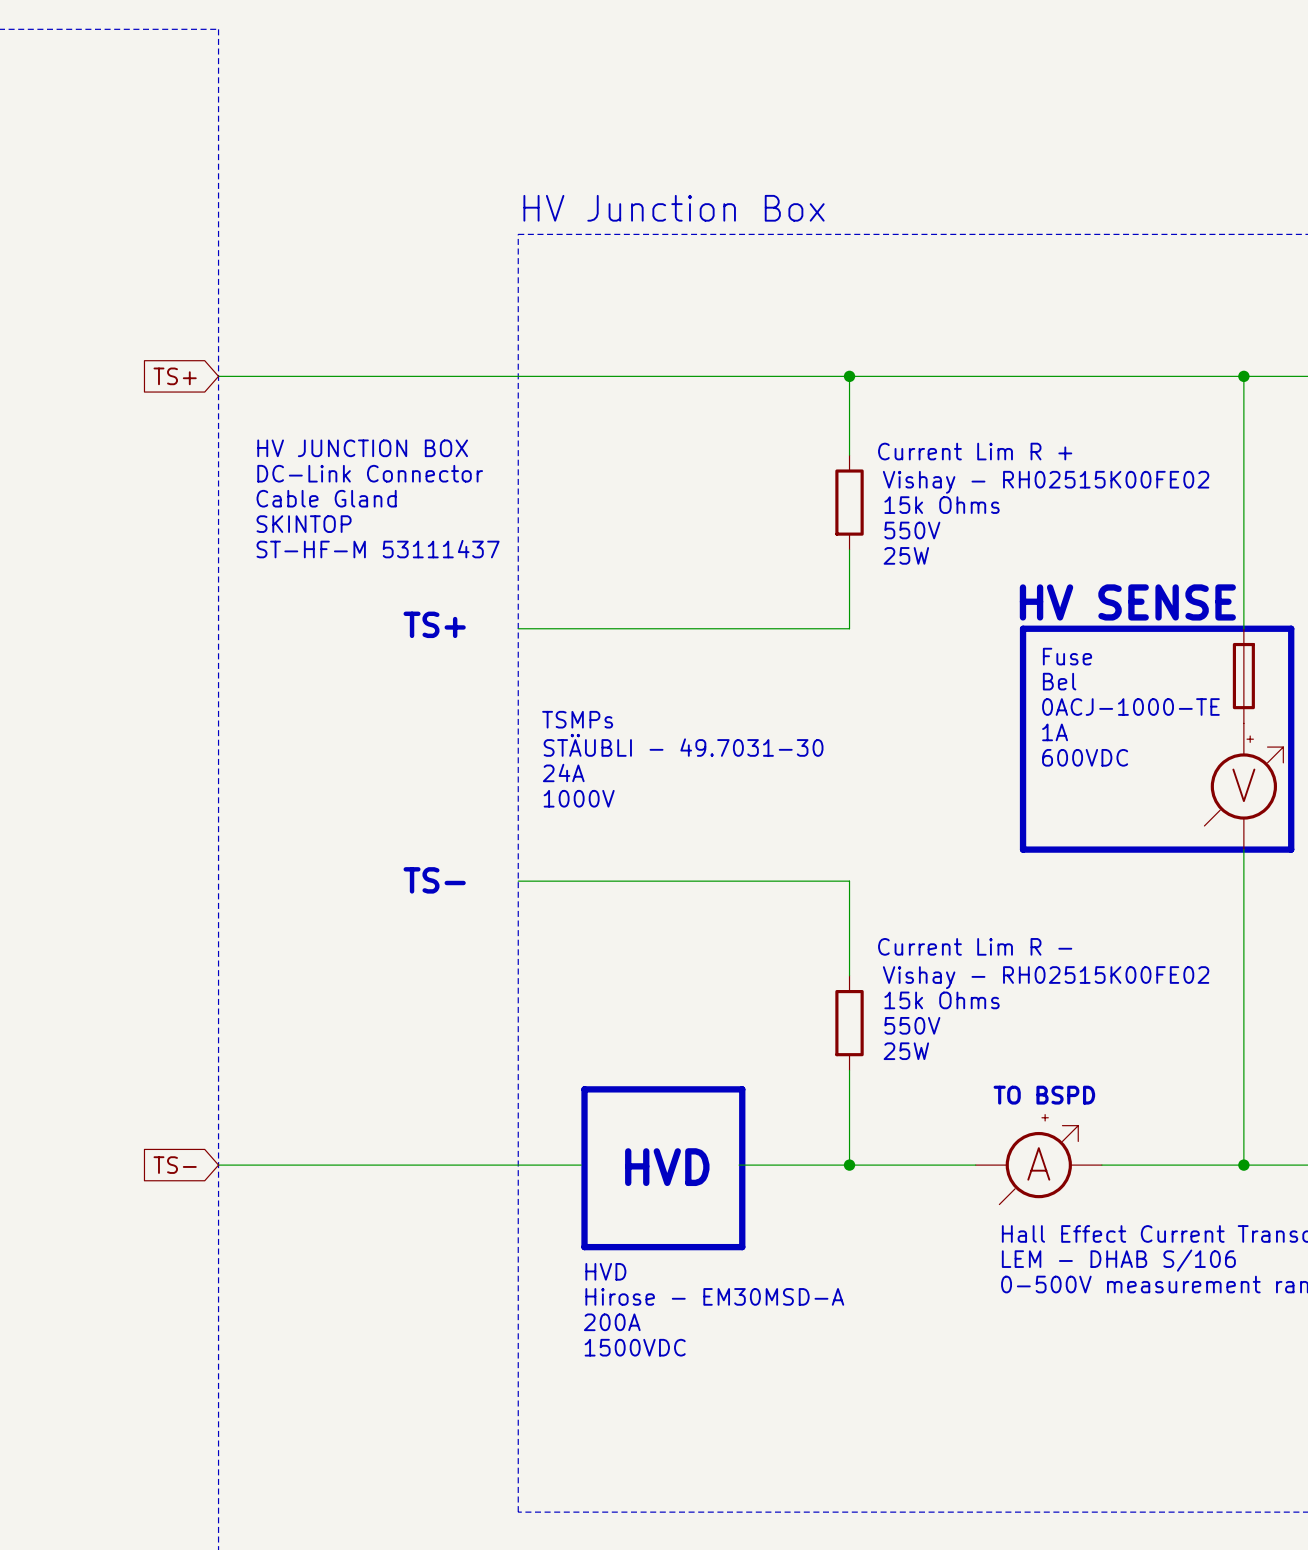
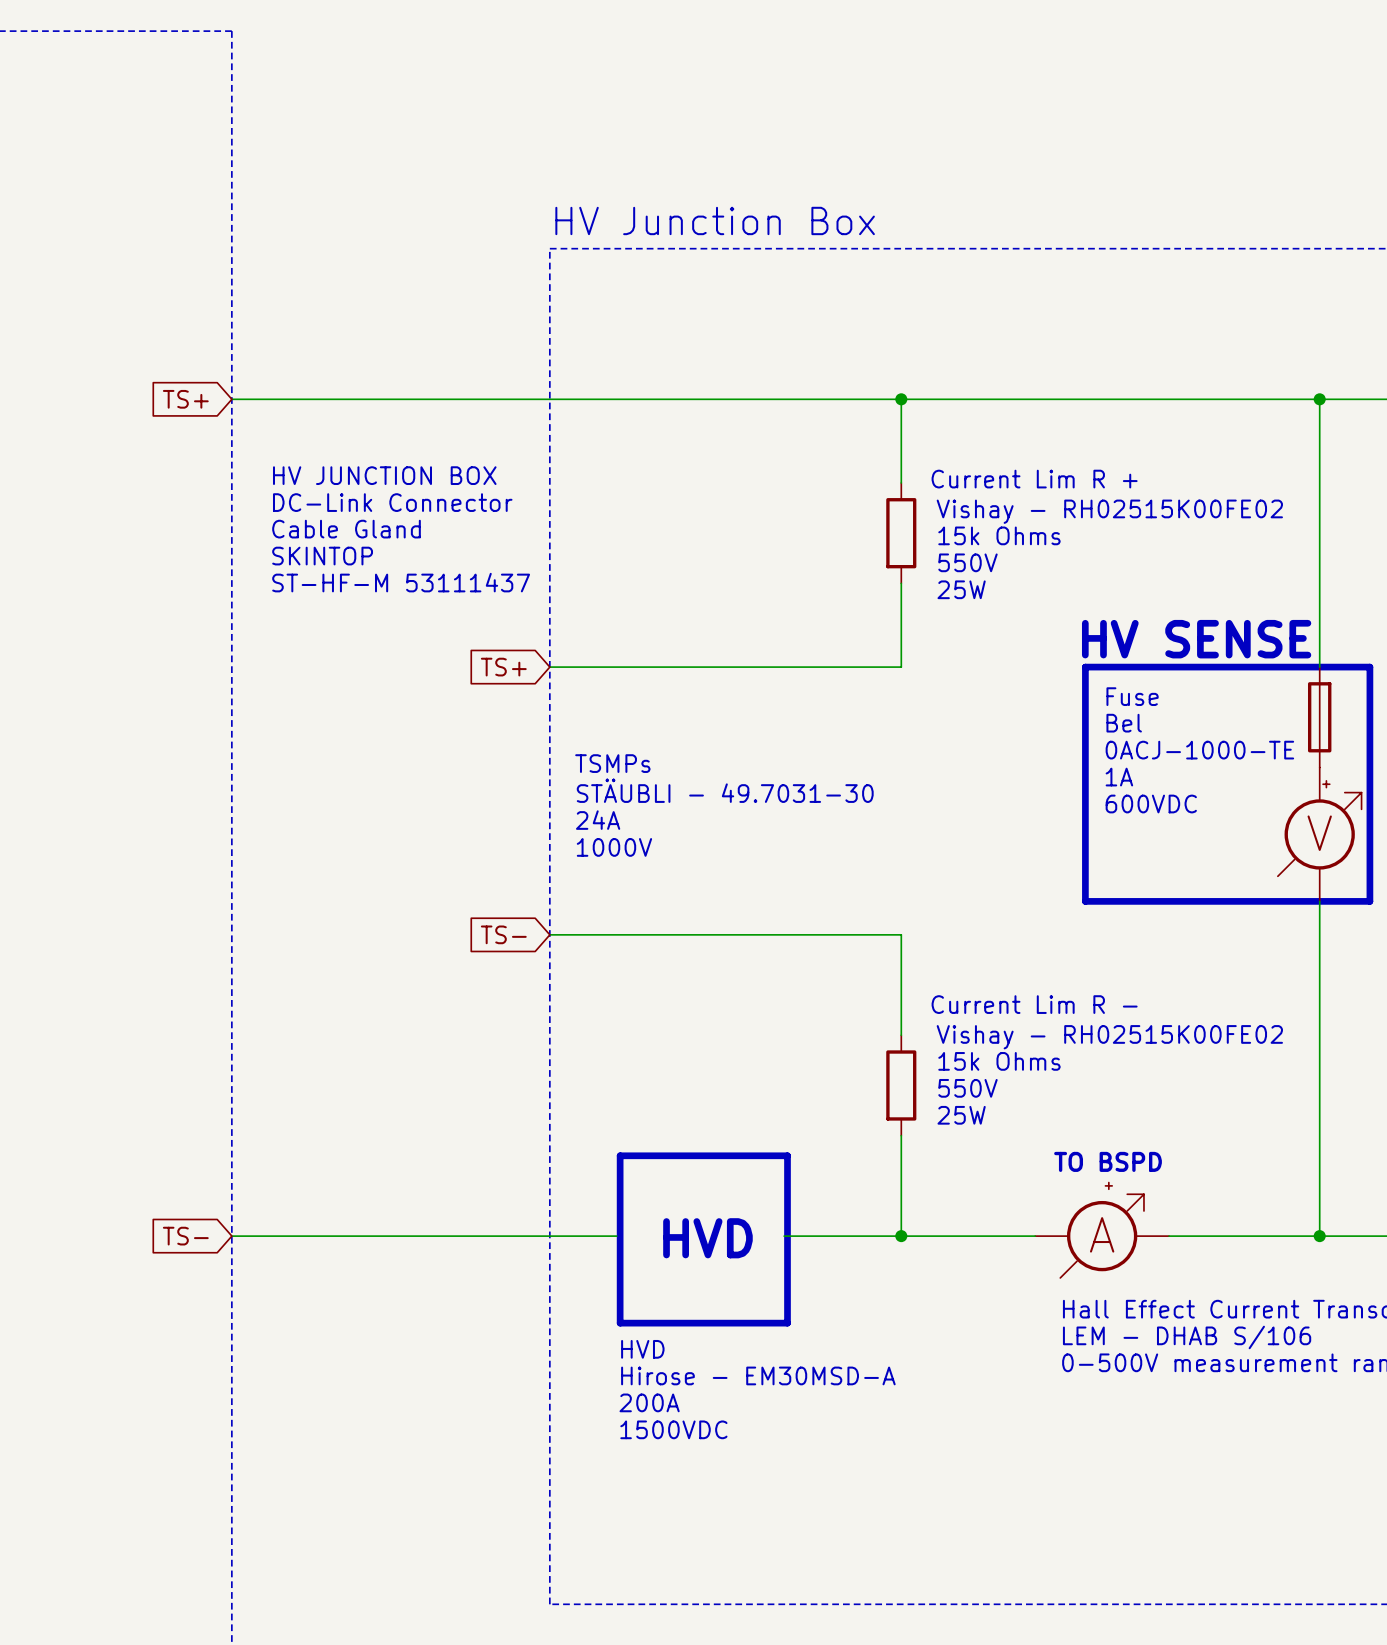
text: TS+ (434, 624) -> none
global label: none -> TS+ (503, 667)
text: TS- (434, 880) -> none
global label: none -> TS- (503, 934)

